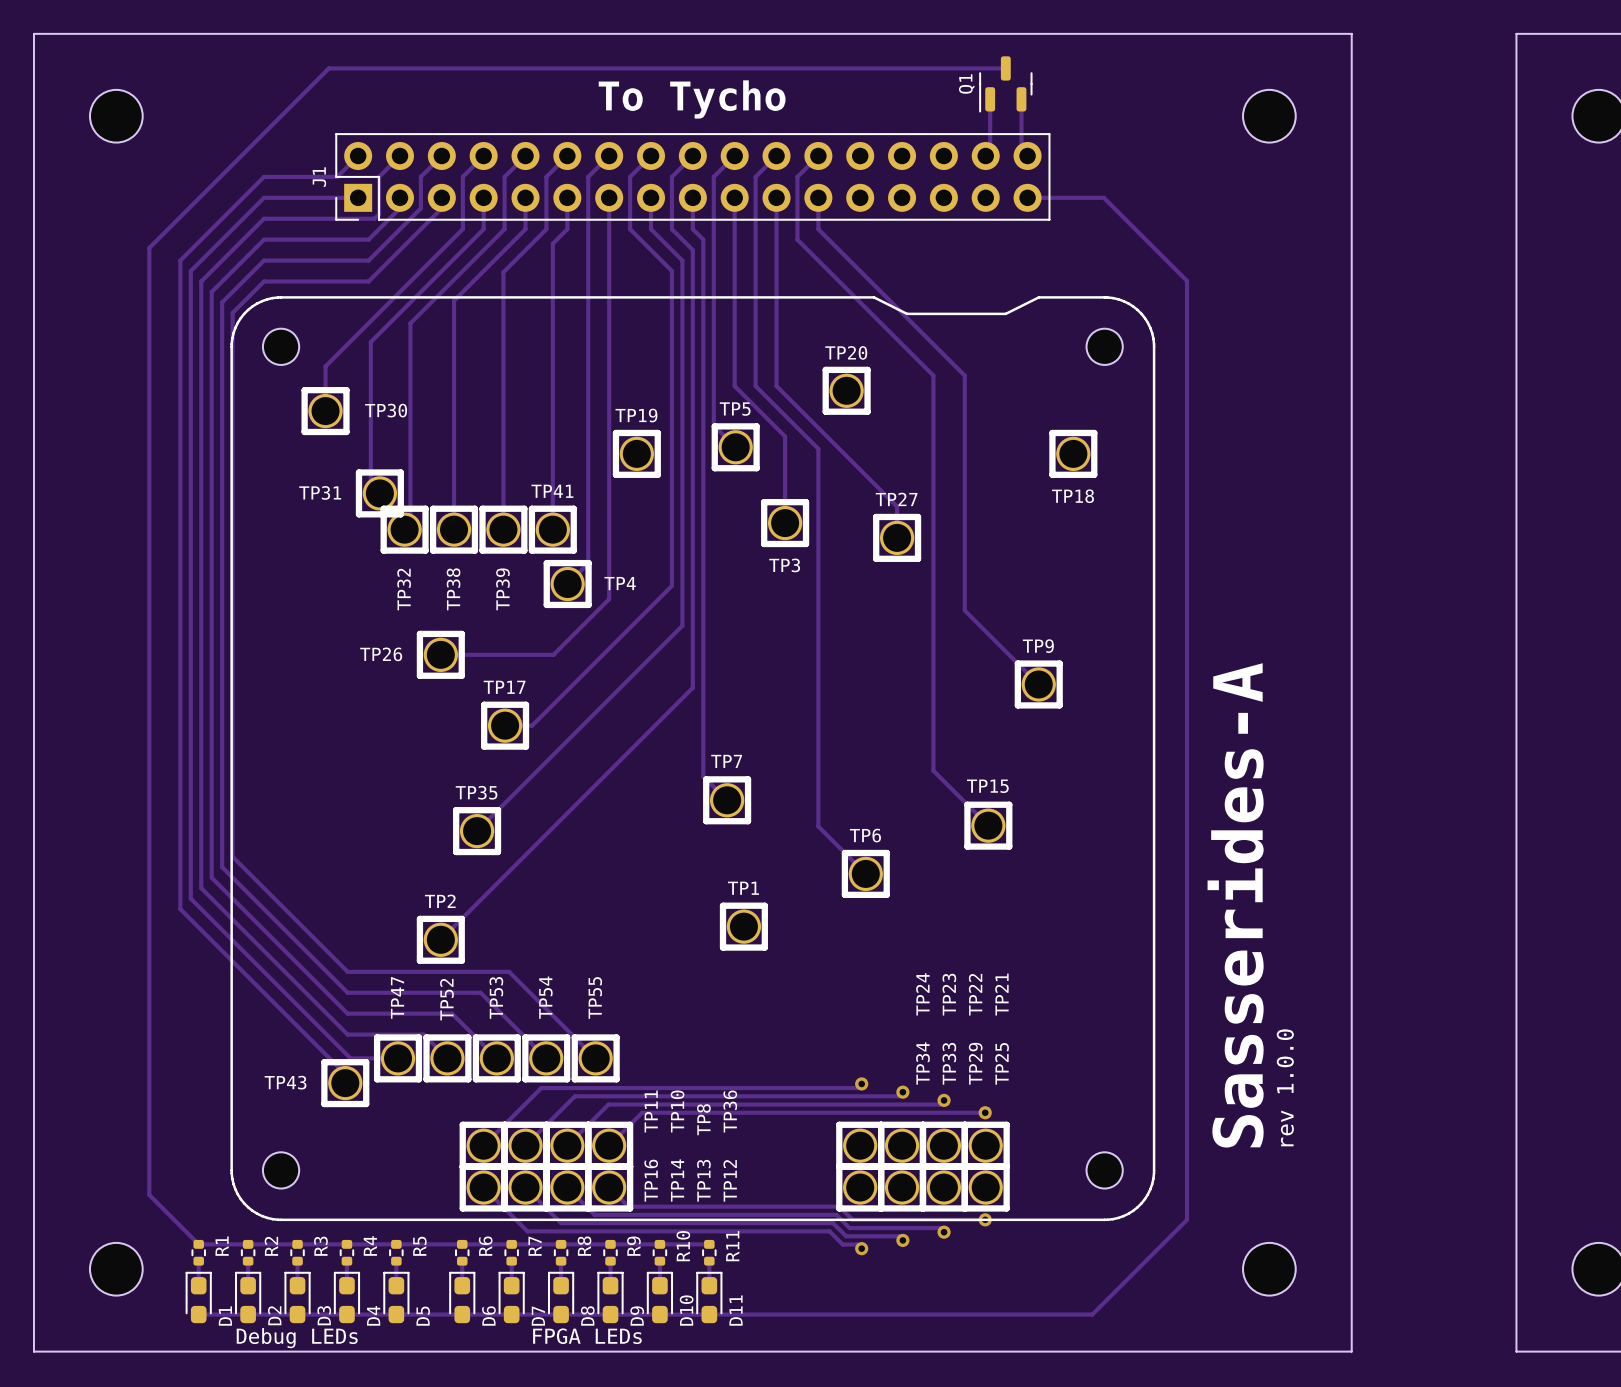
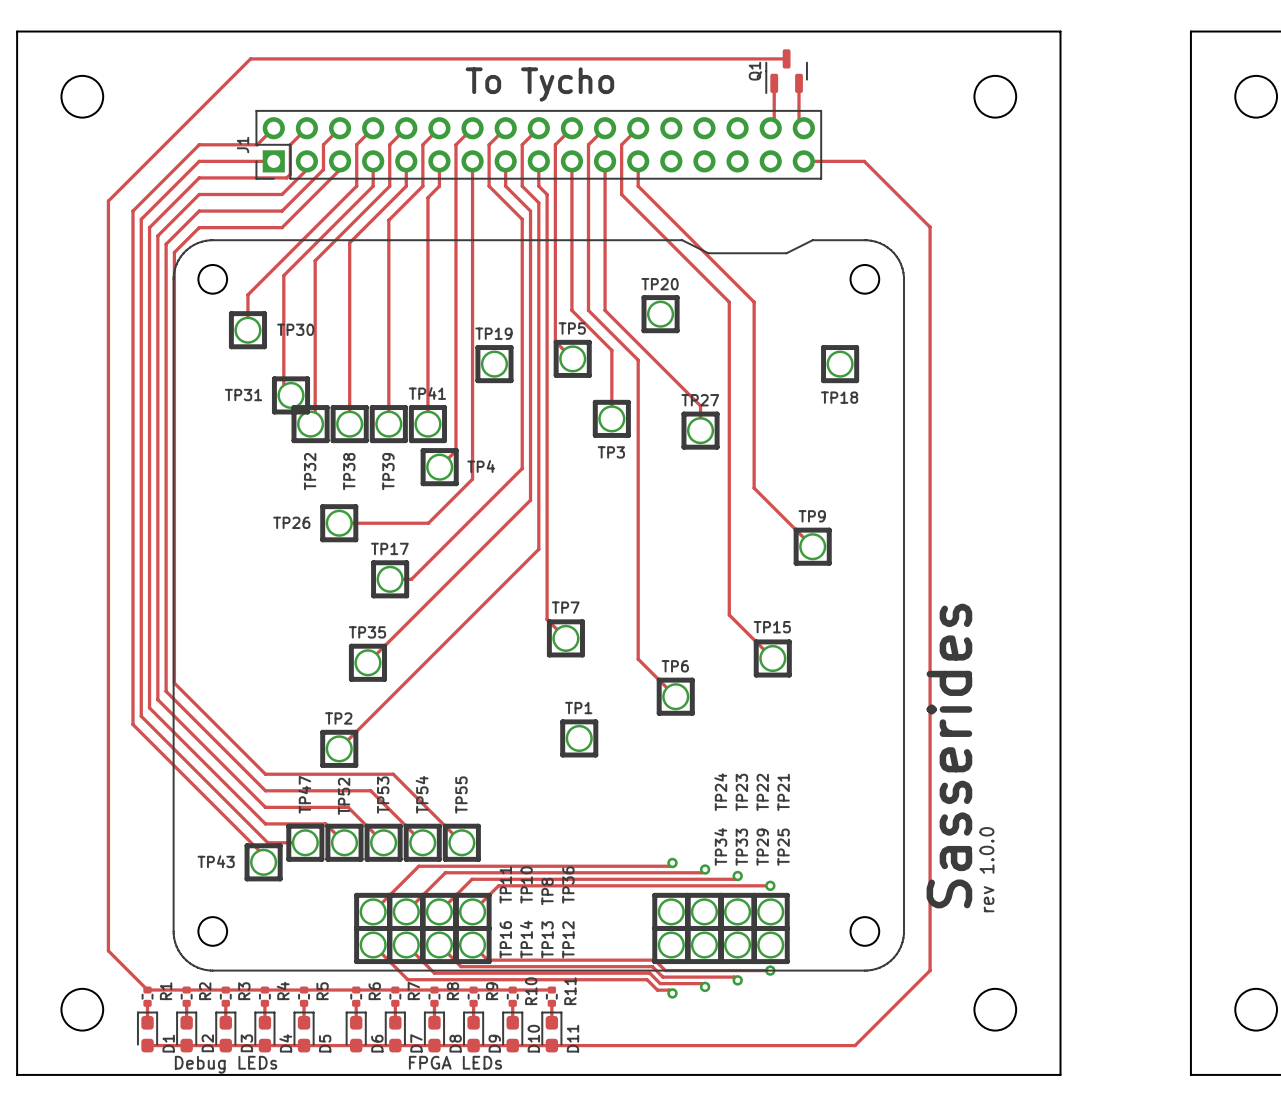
text: Sasserides-A (1235, 905) -> rev 1.0.0 (986, 869)
text: none -> Sasserides (949, 756)
text: rev 1.0.0 (1285, 1087) -> none

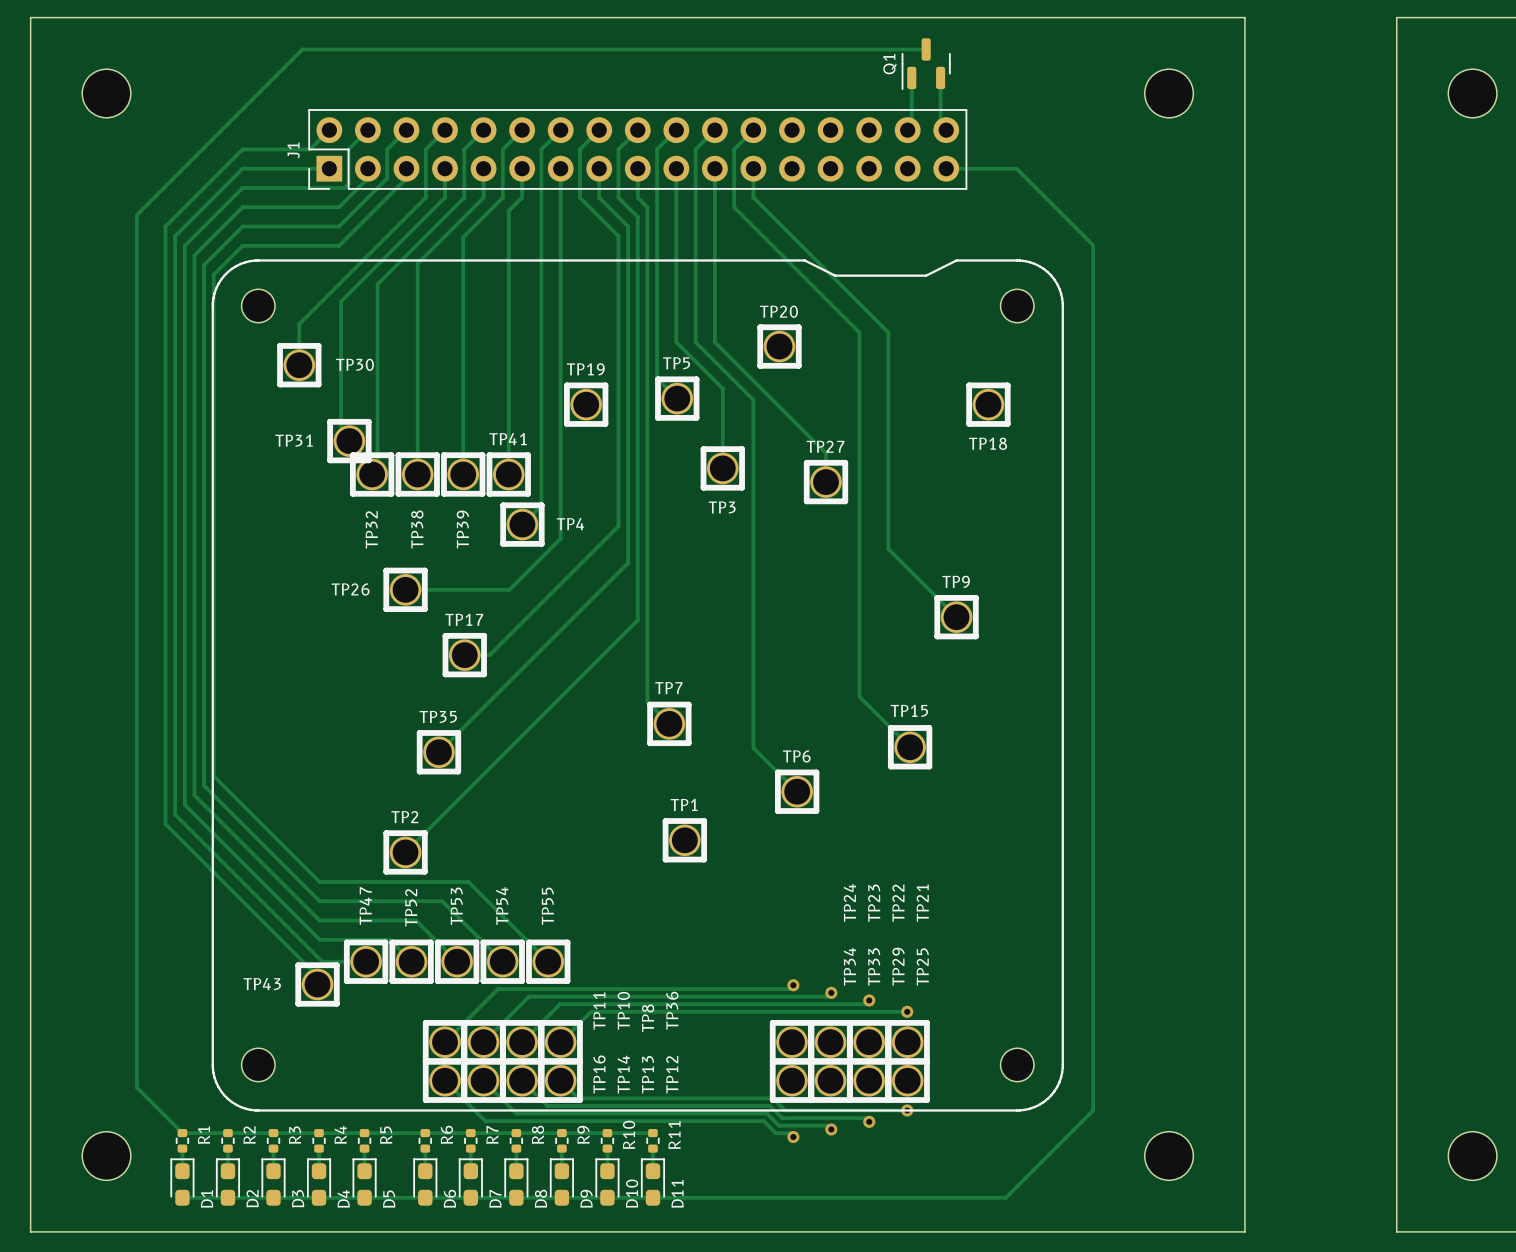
text: To Tycho (539, 84) -> none
text: Sasserides (949, 756) -> none
text: rev 1.0.0 (986, 869) -> none
text: FPGA LEDs (455, 1062) -> none
text: Debug LEDs (226, 1064) -> none

